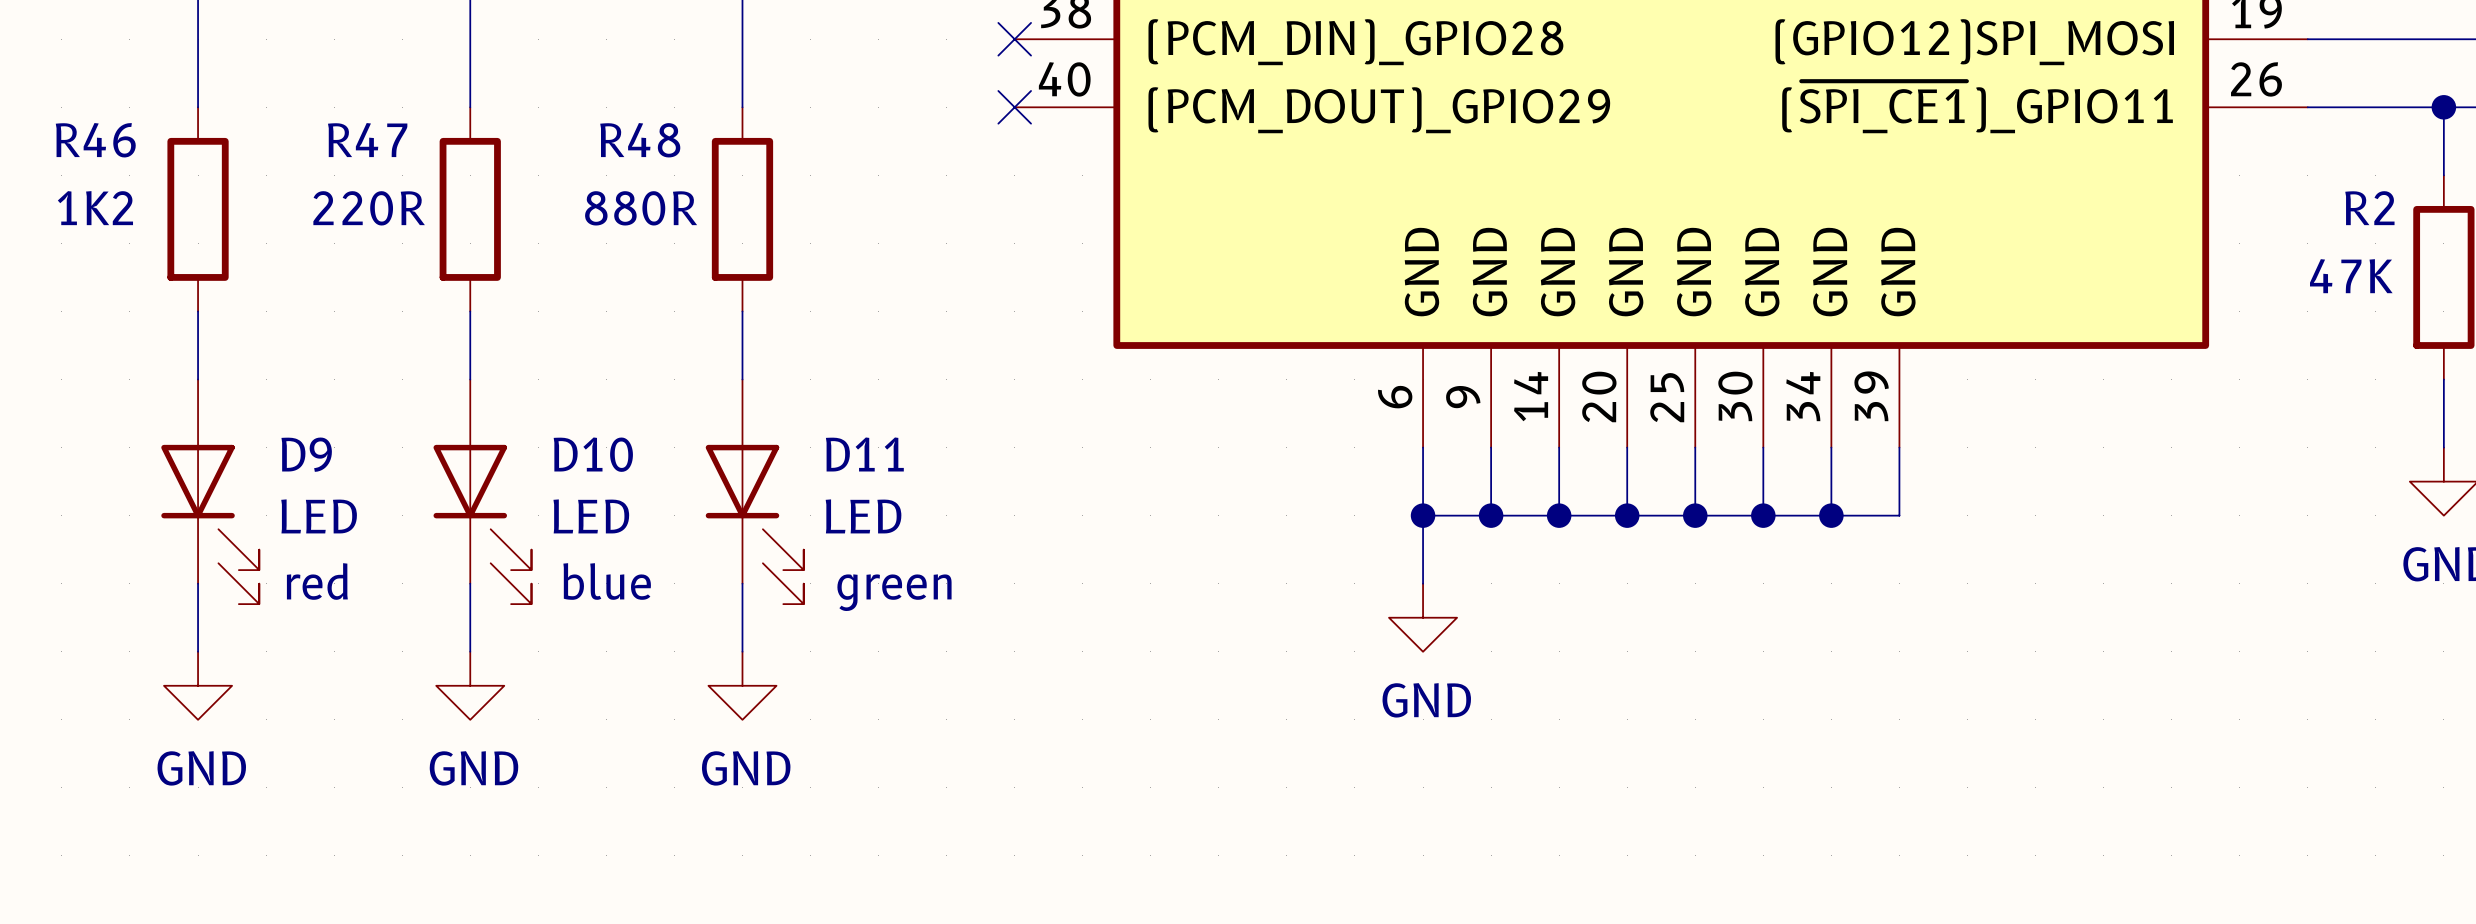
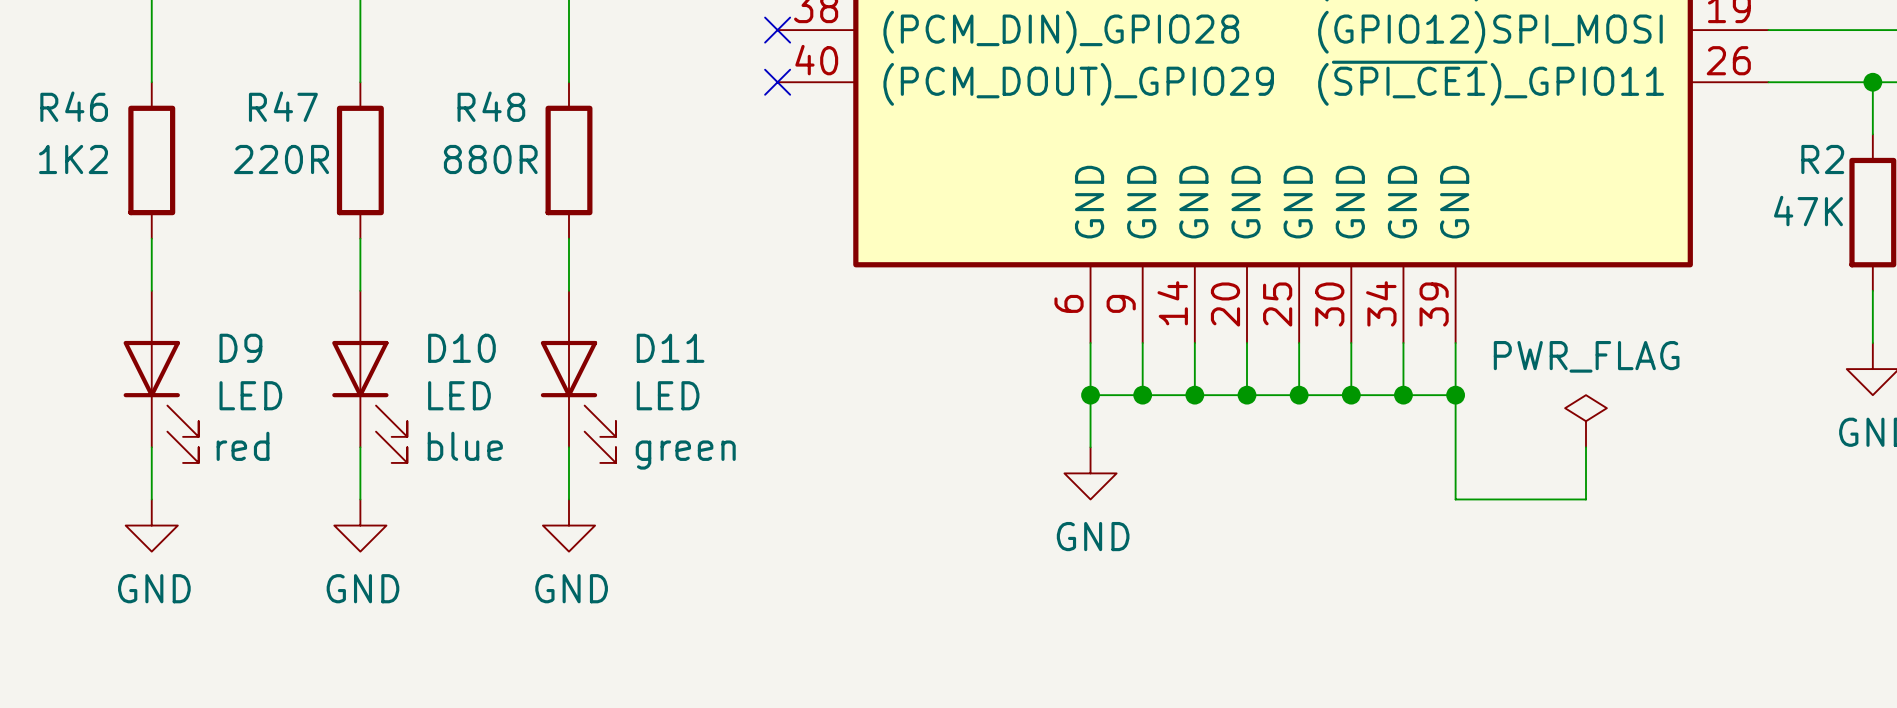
wire: none -> (1455, 395) (1455, 499) (1586, 499) (1586, 447)
junction: none -> (1455, 395)
power symbol: none -> PWR_FLAG (1586, 421)

